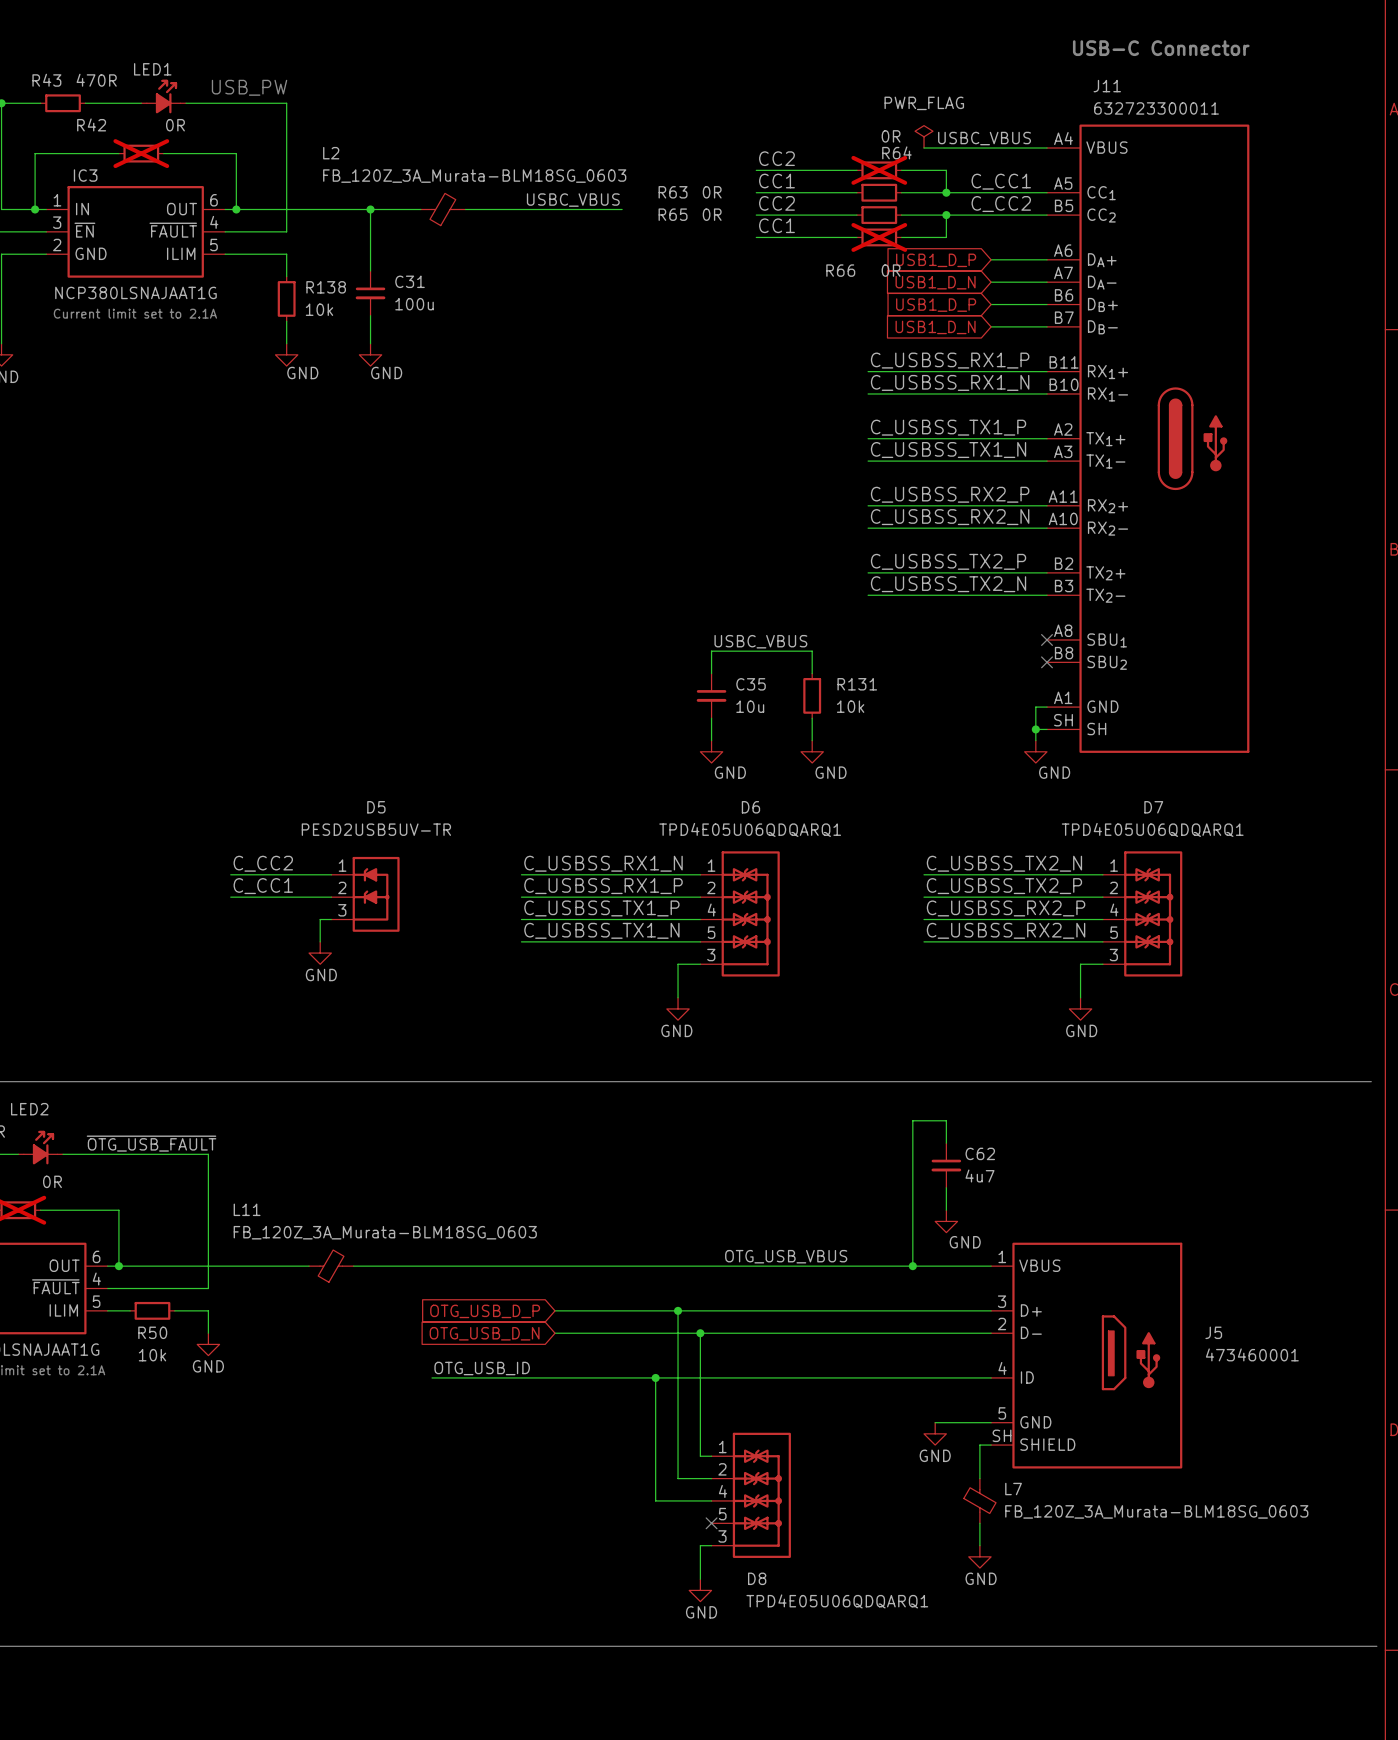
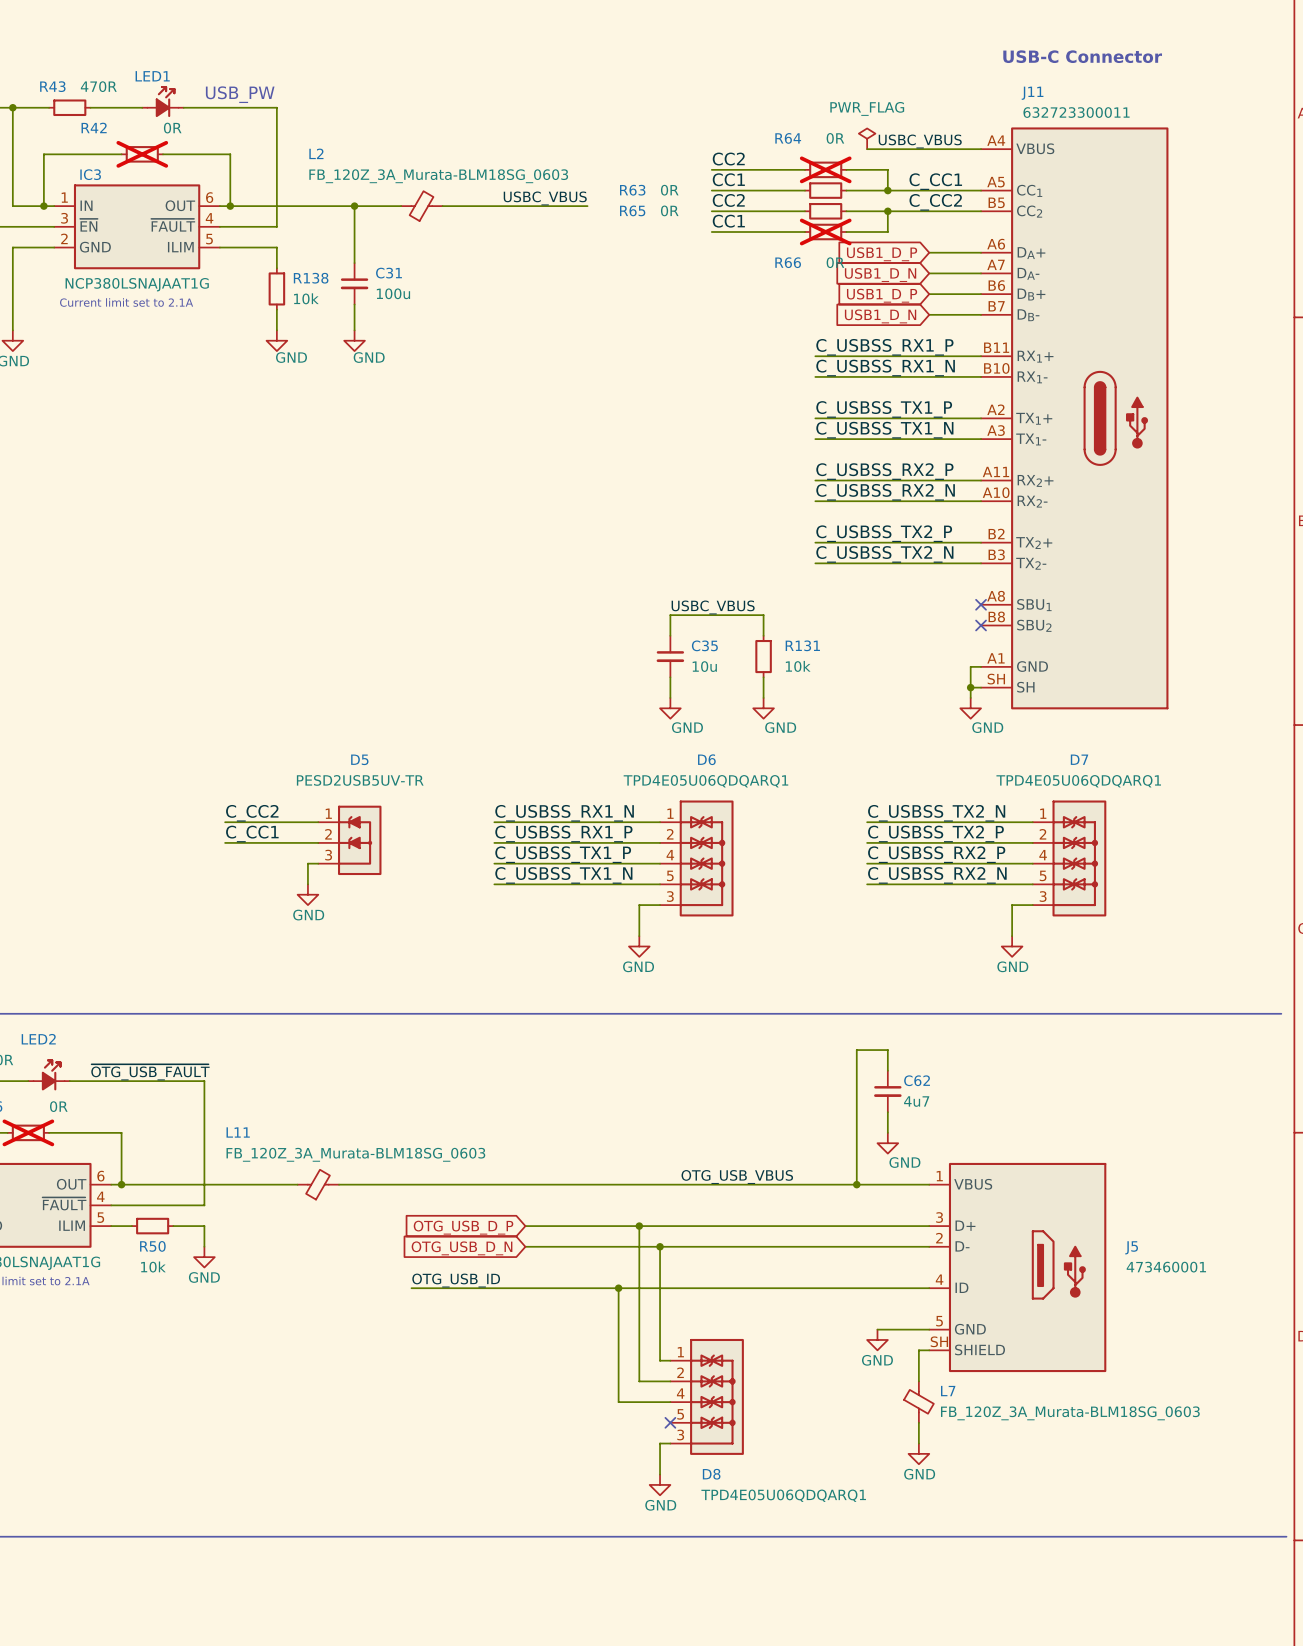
R64 name position: R64 (896, 152) -> R64 (788, 138)

